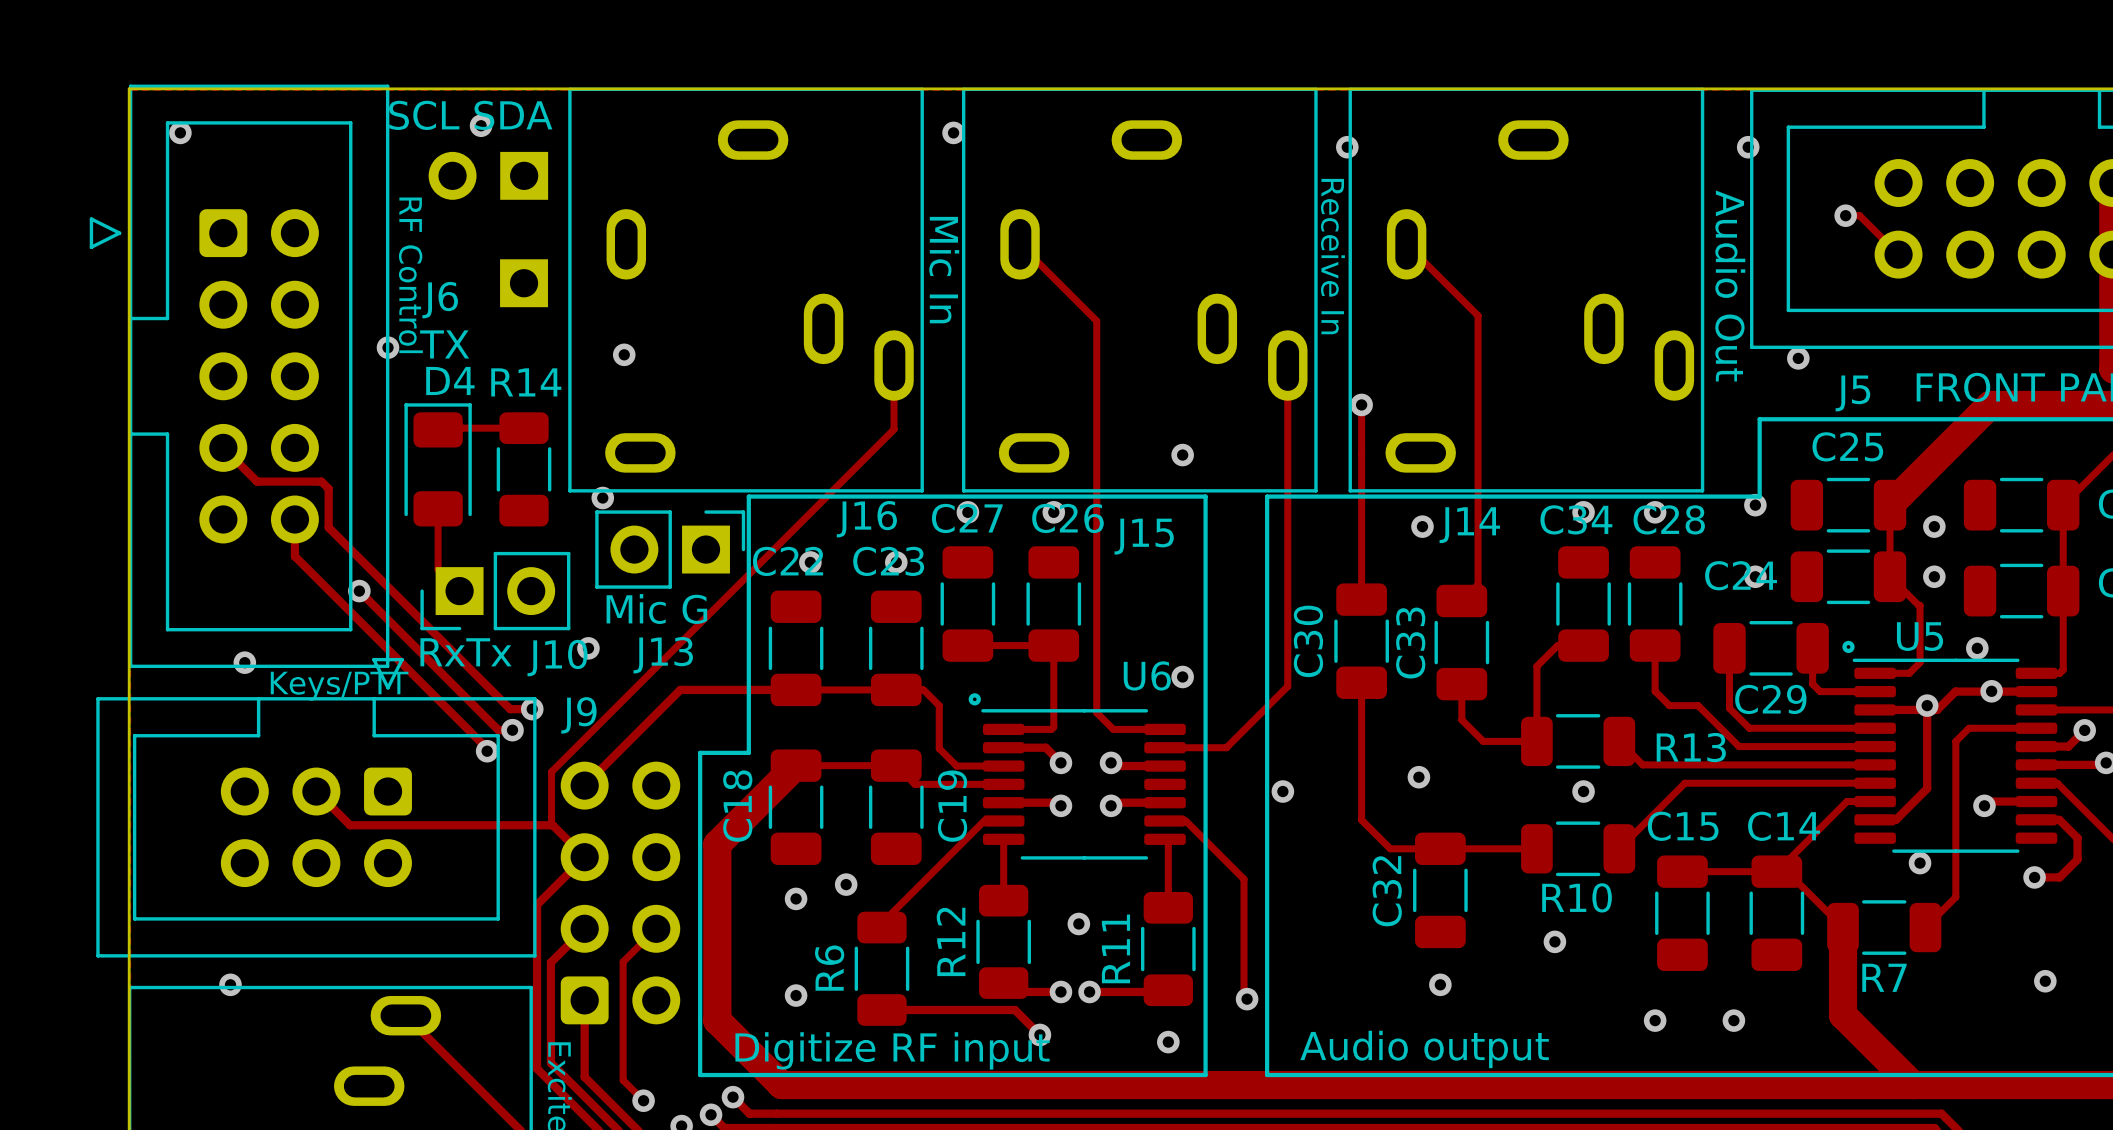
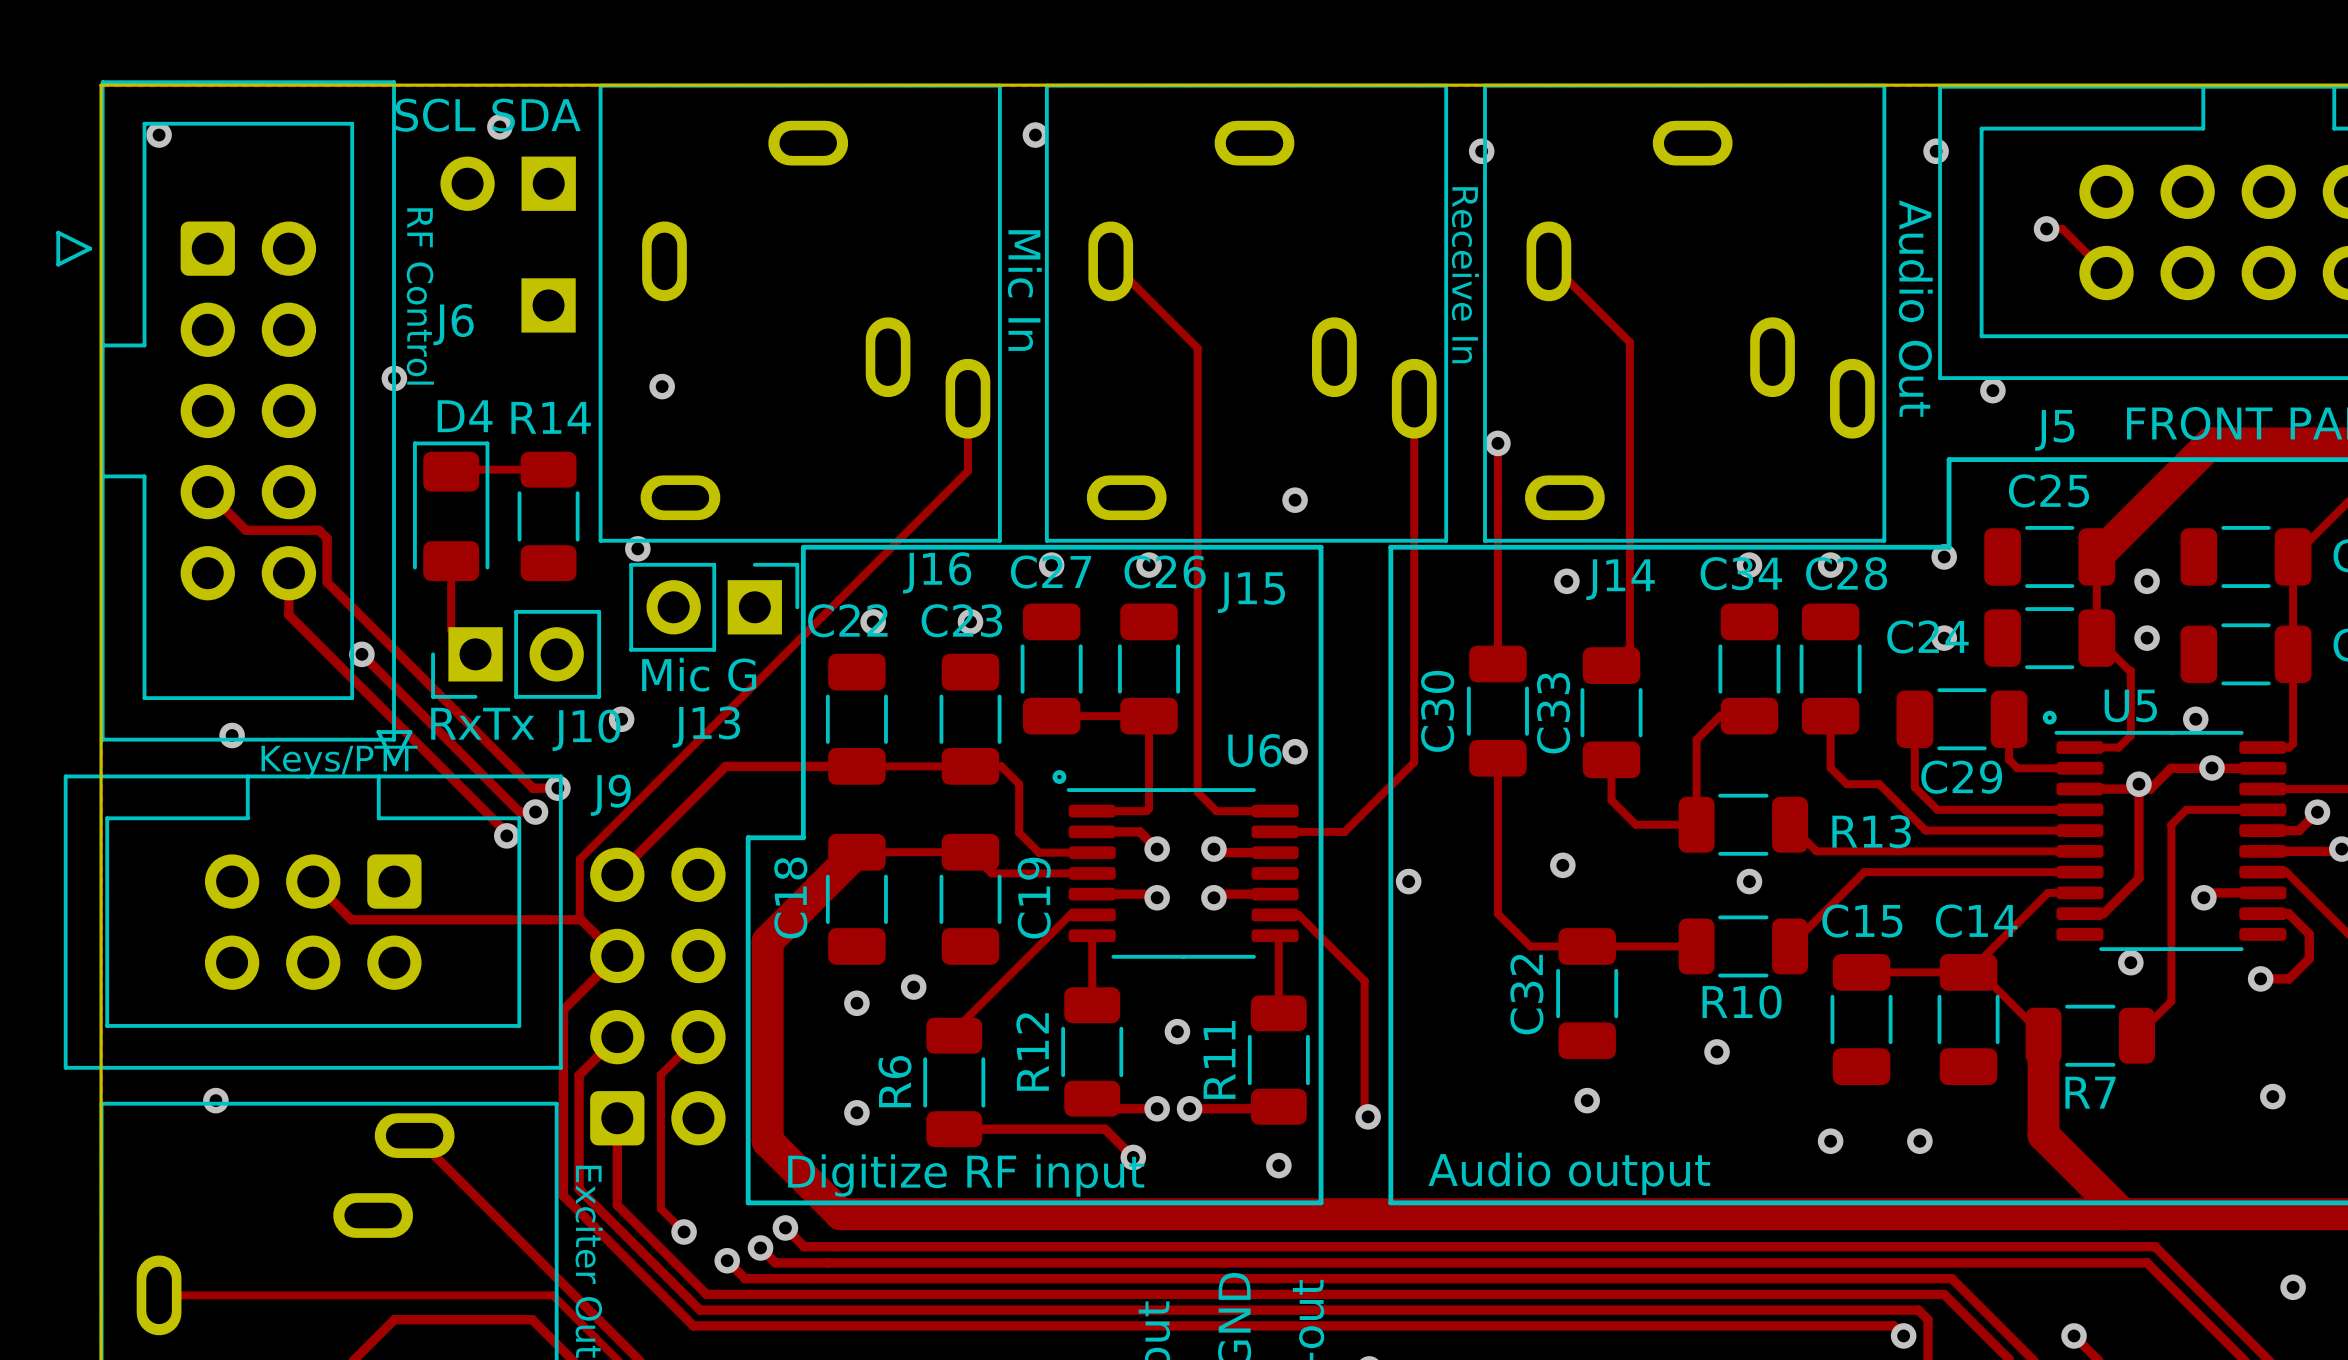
text: TX (444, 344) -> none

